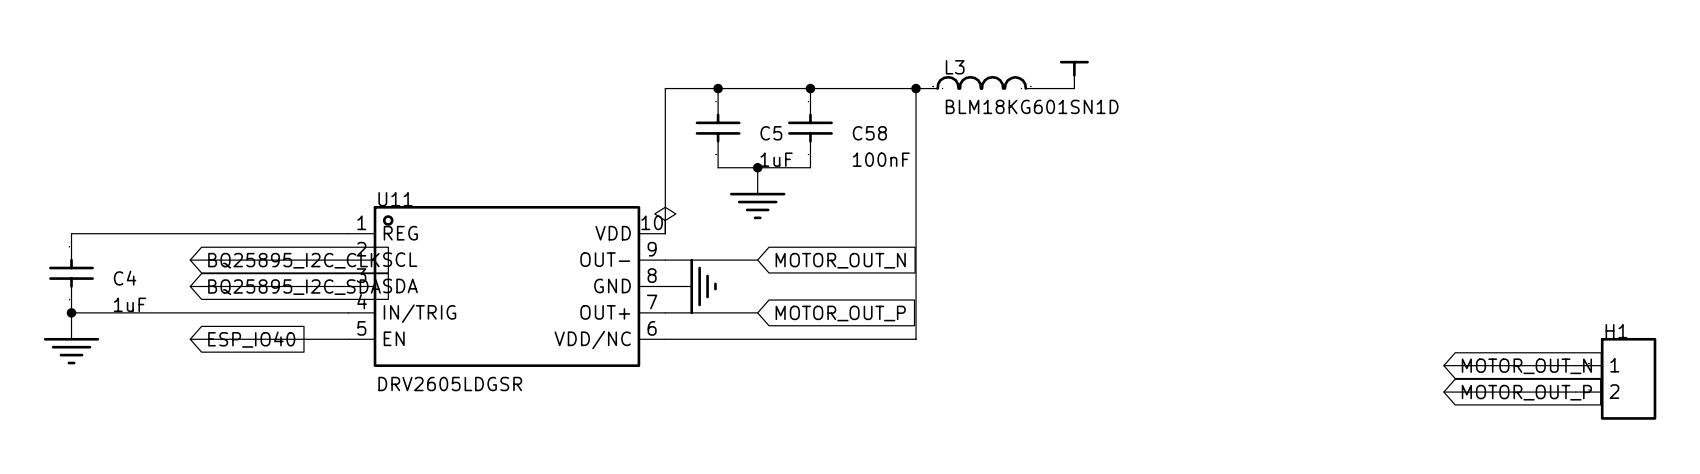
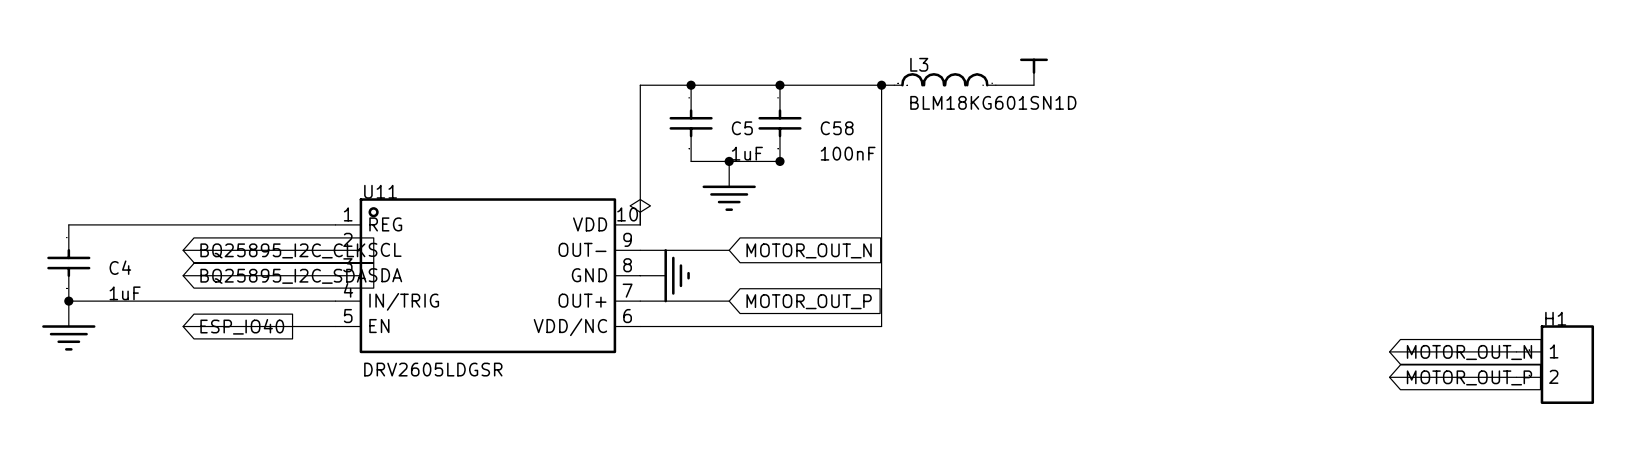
junction: none -> (779, 161)

